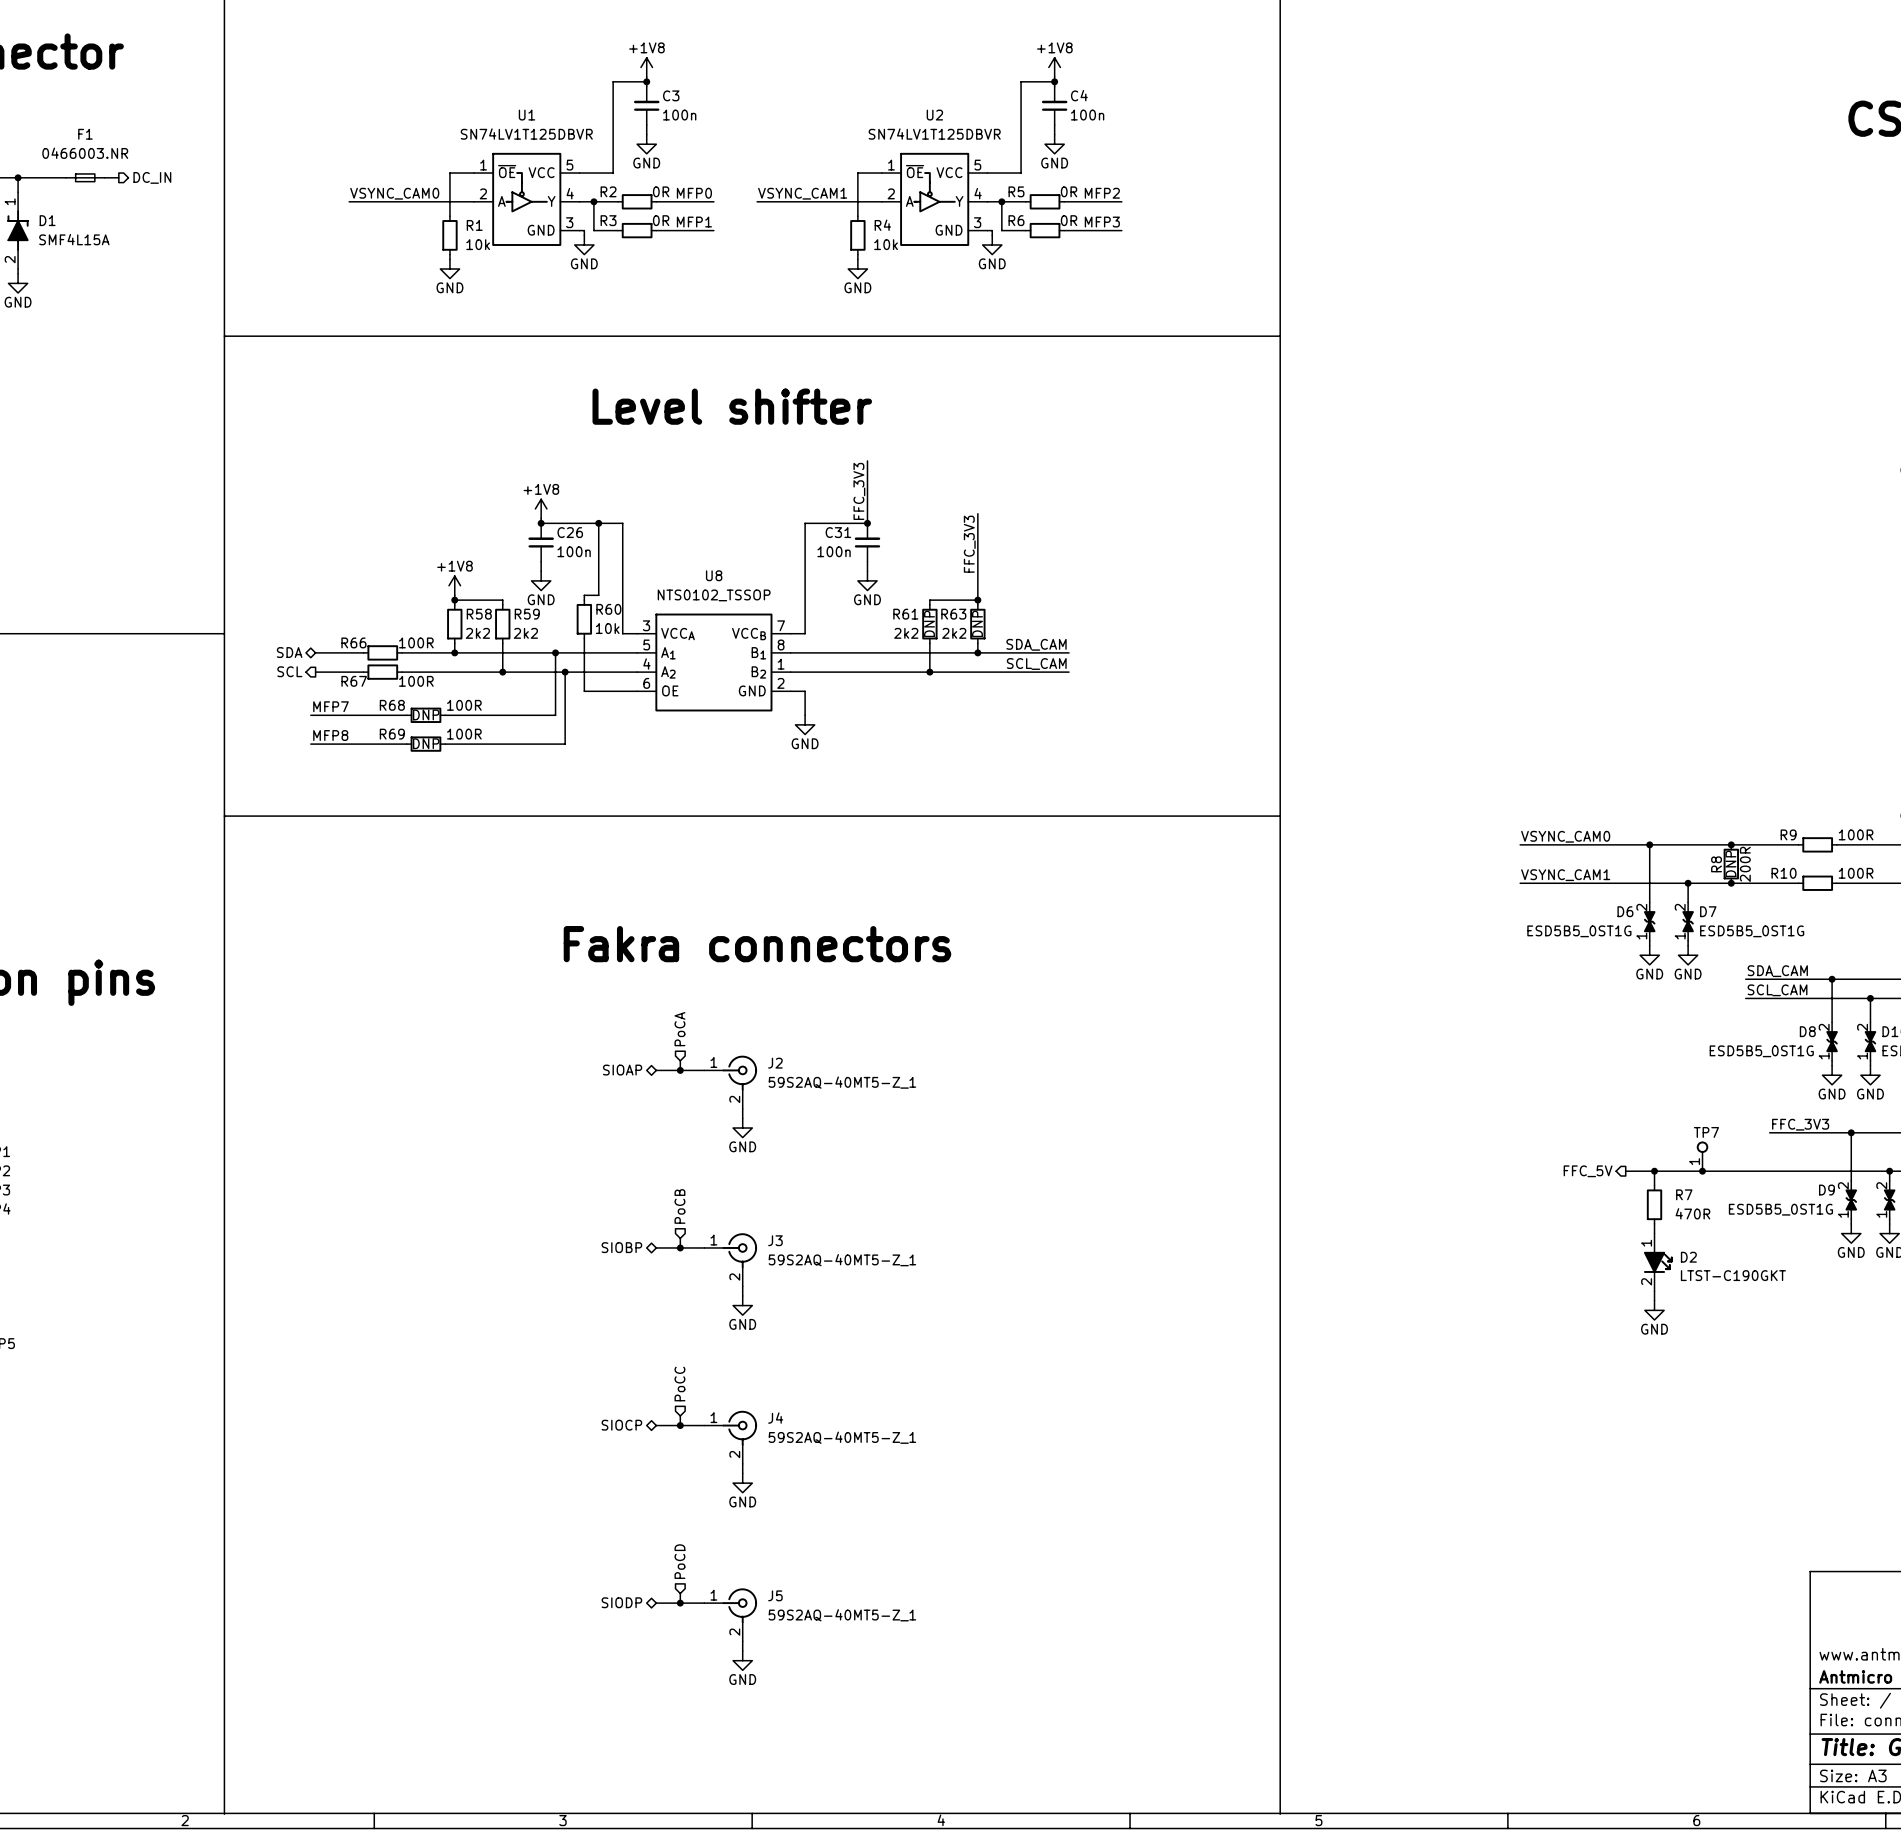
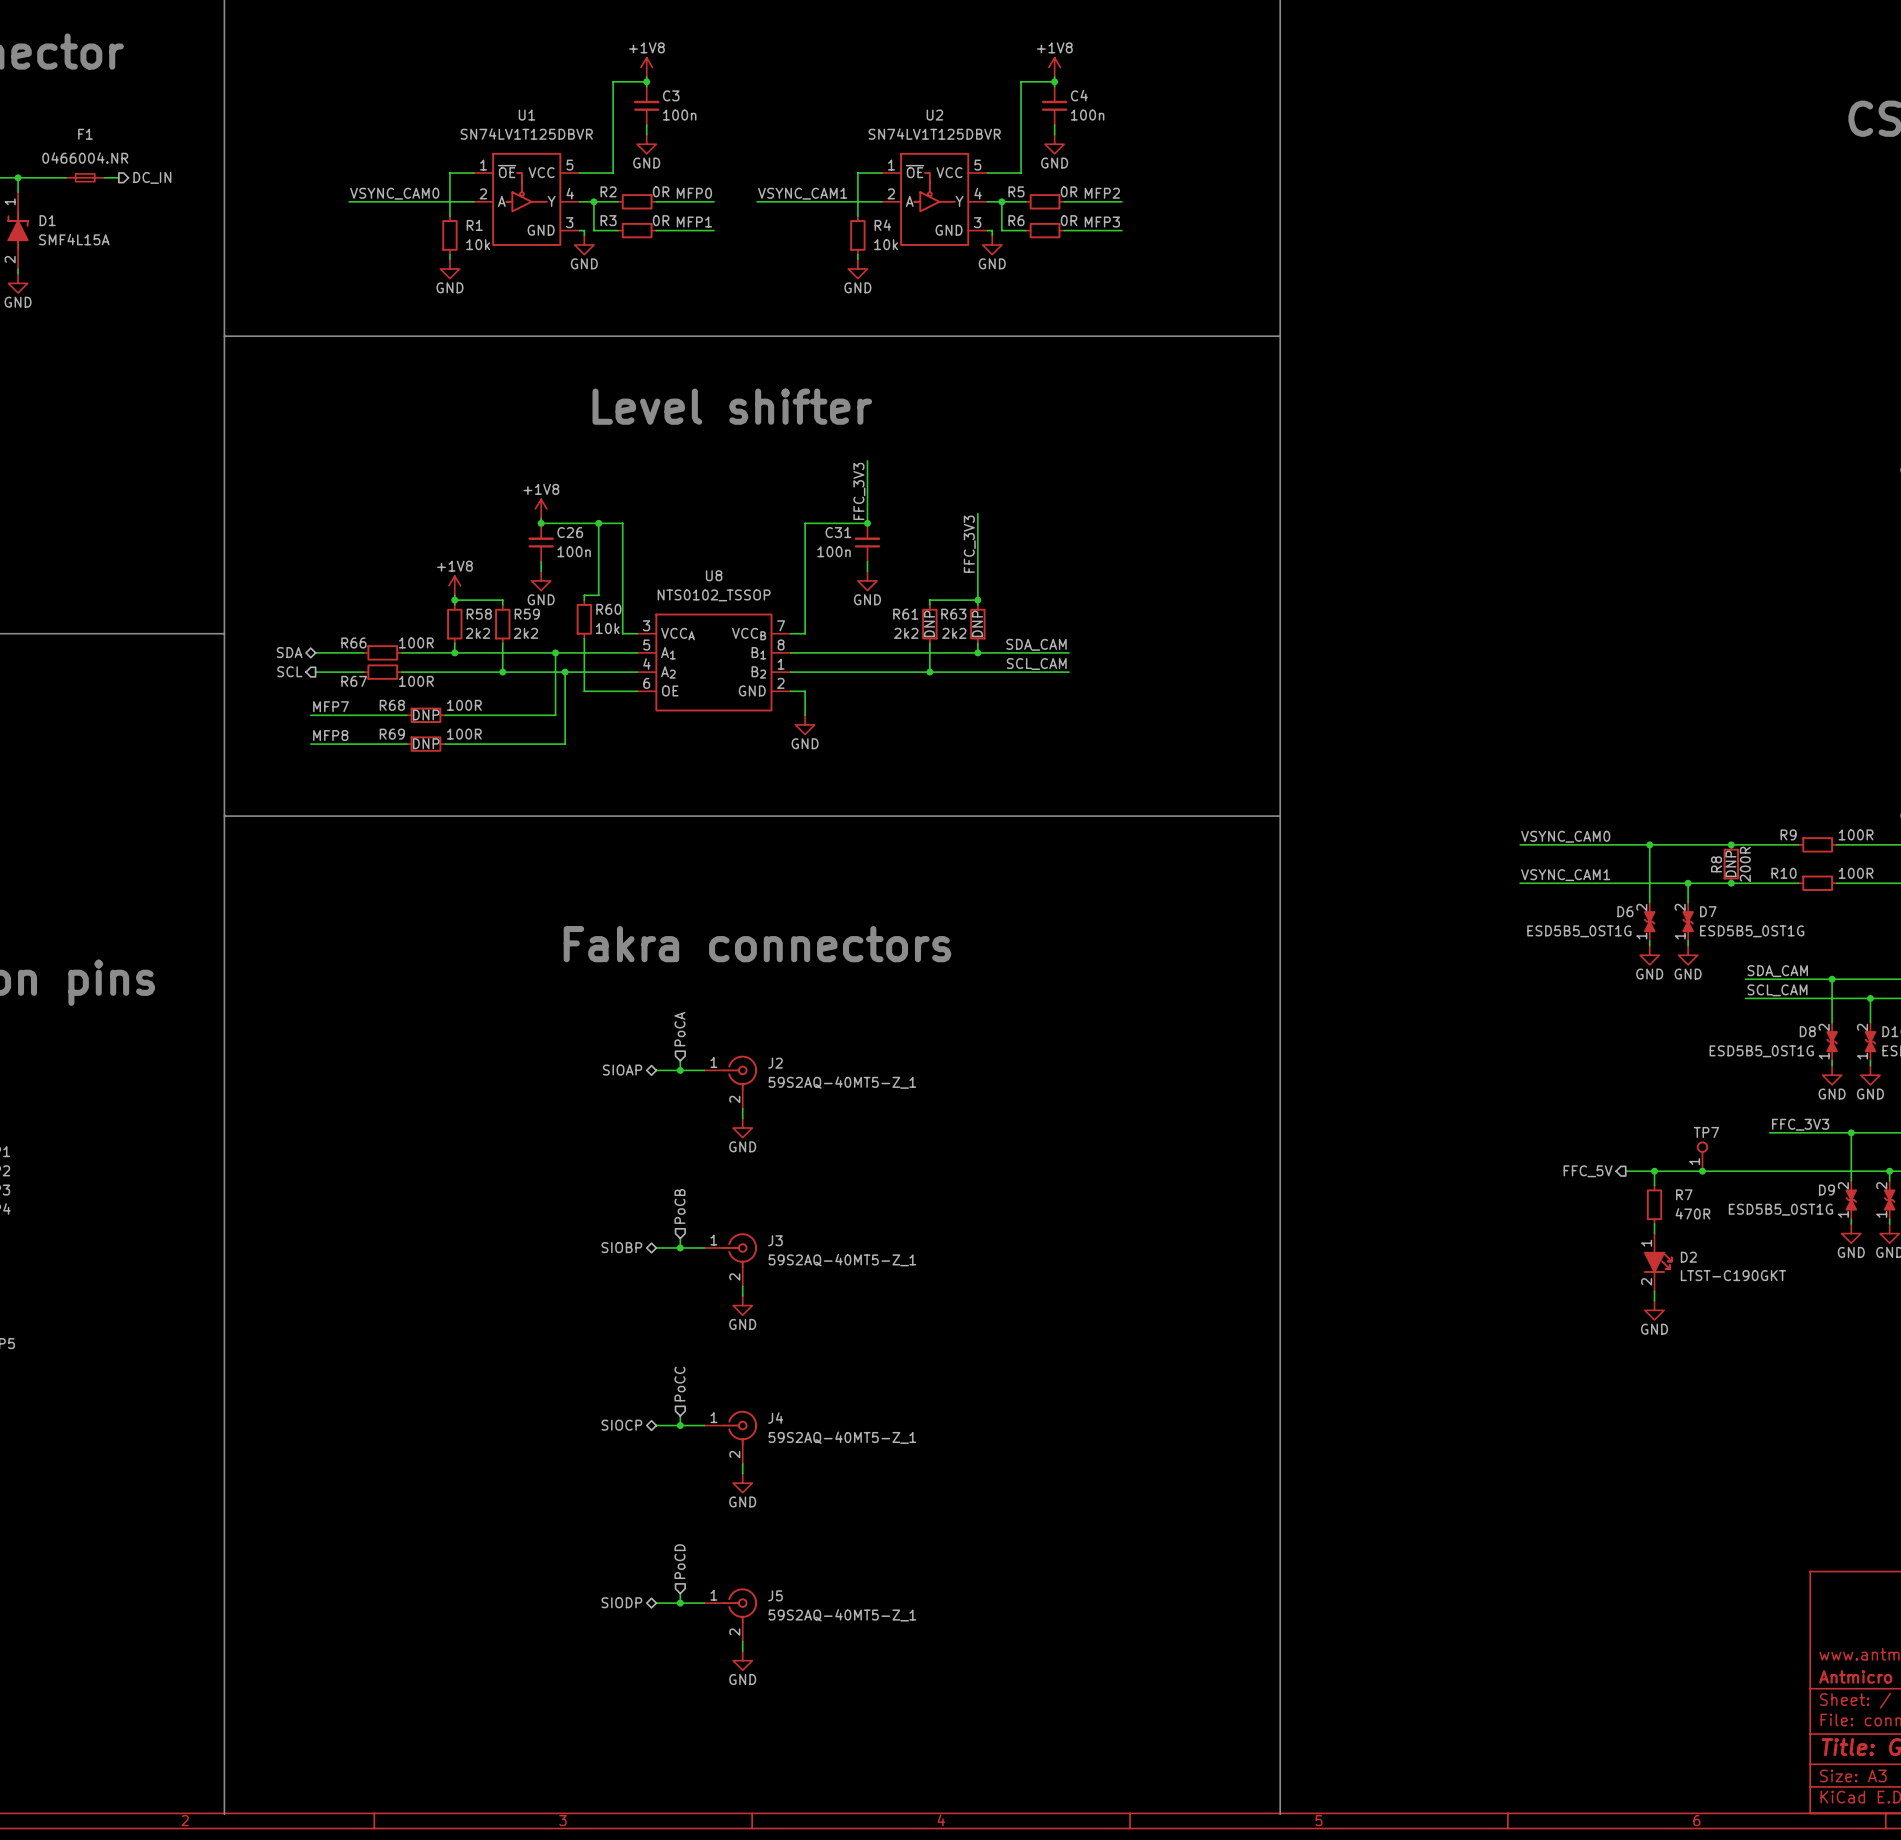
F1 text: 0466003.NR (85, 153) -> 0466004.NR (85, 158)

